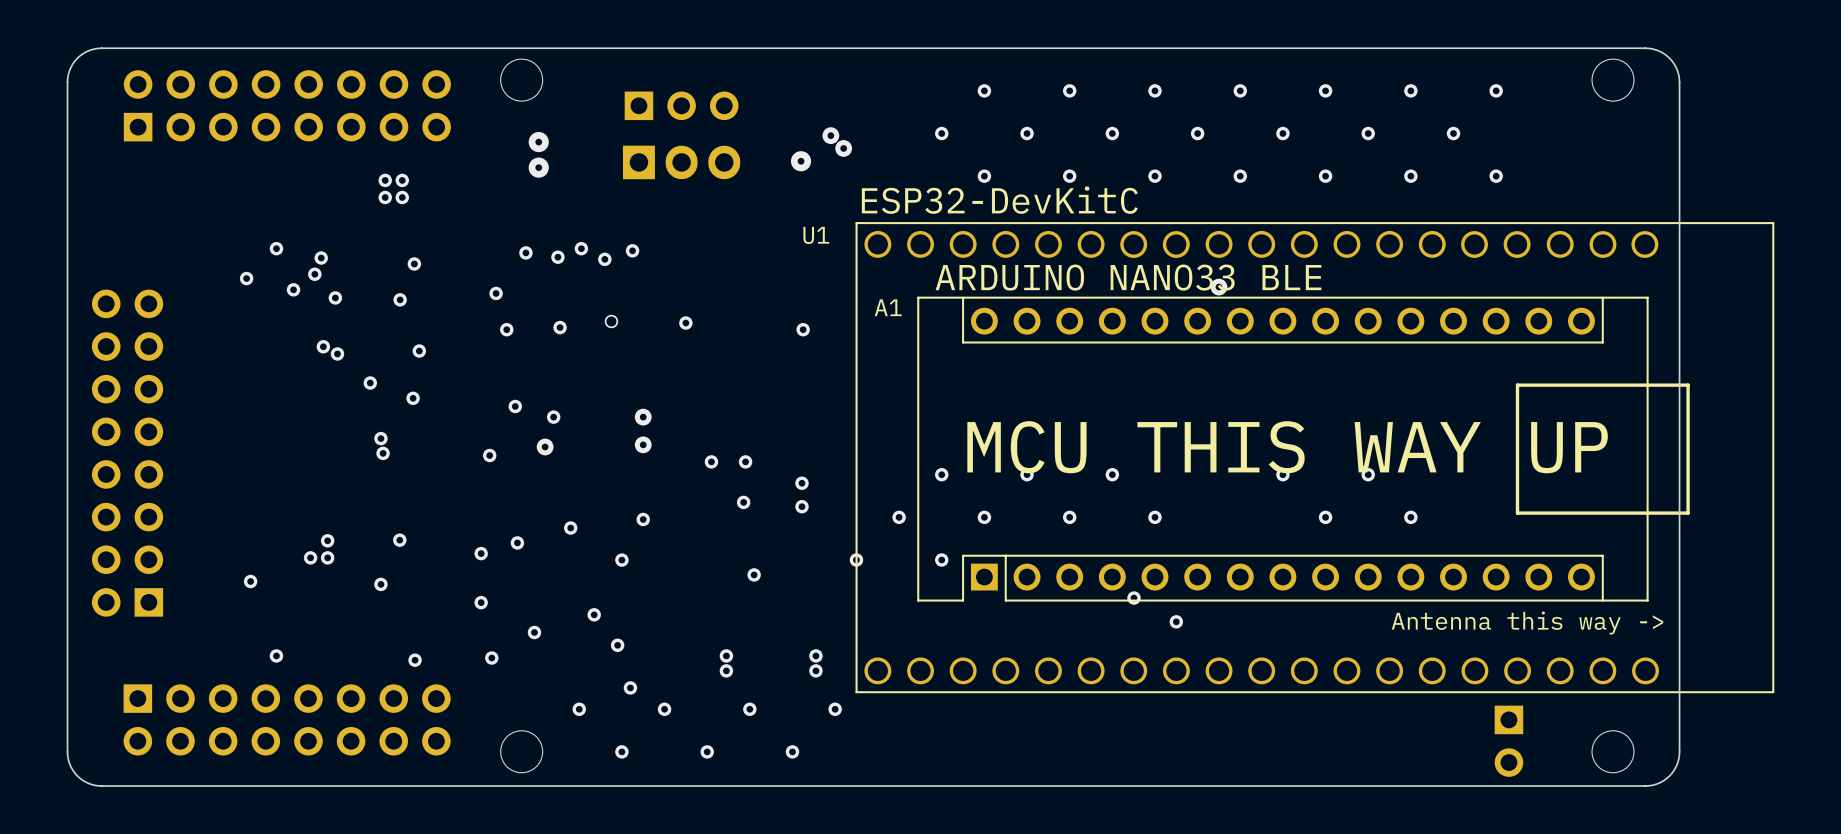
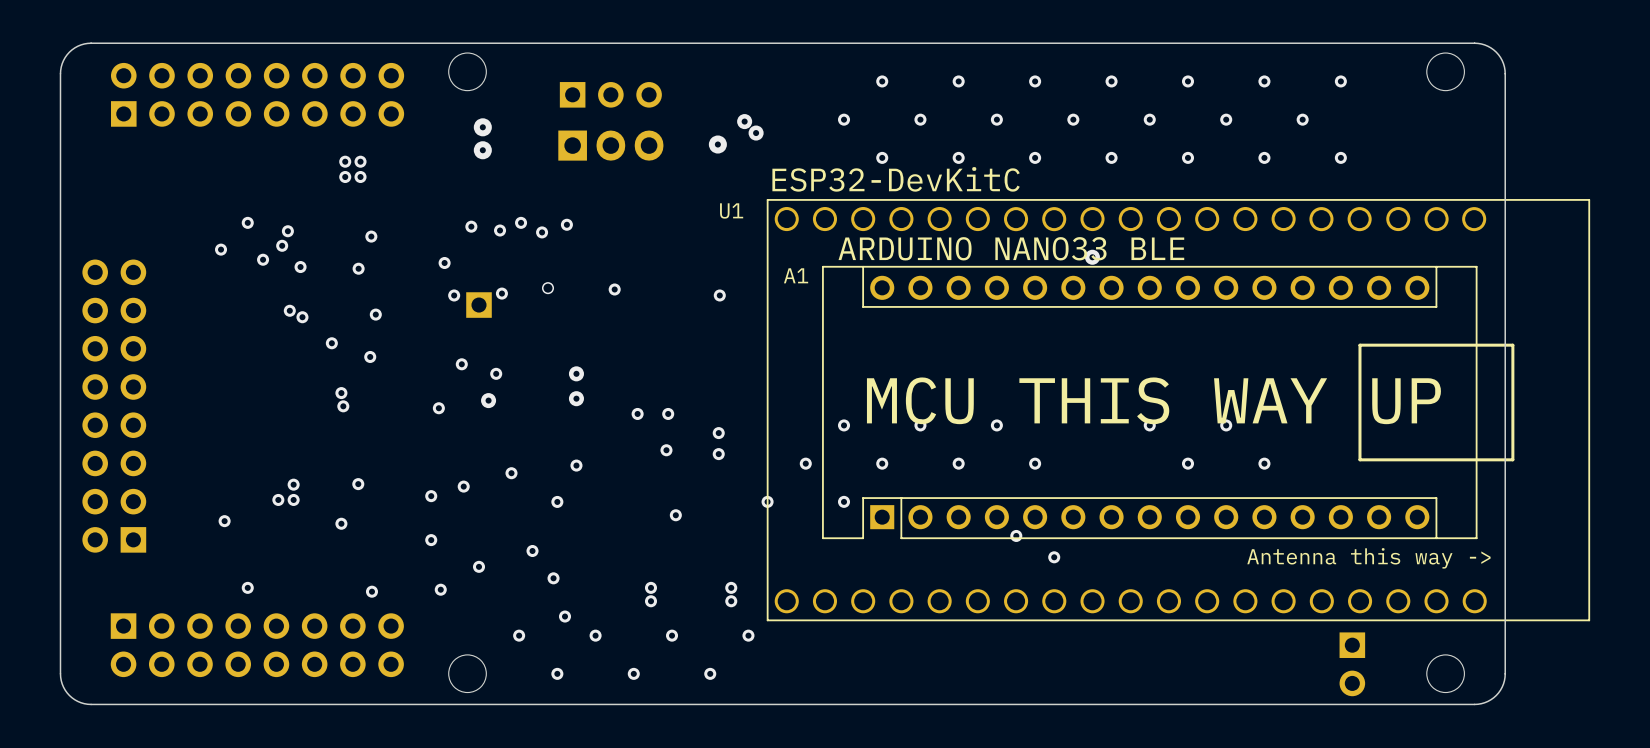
part: none -> (479, 305)

